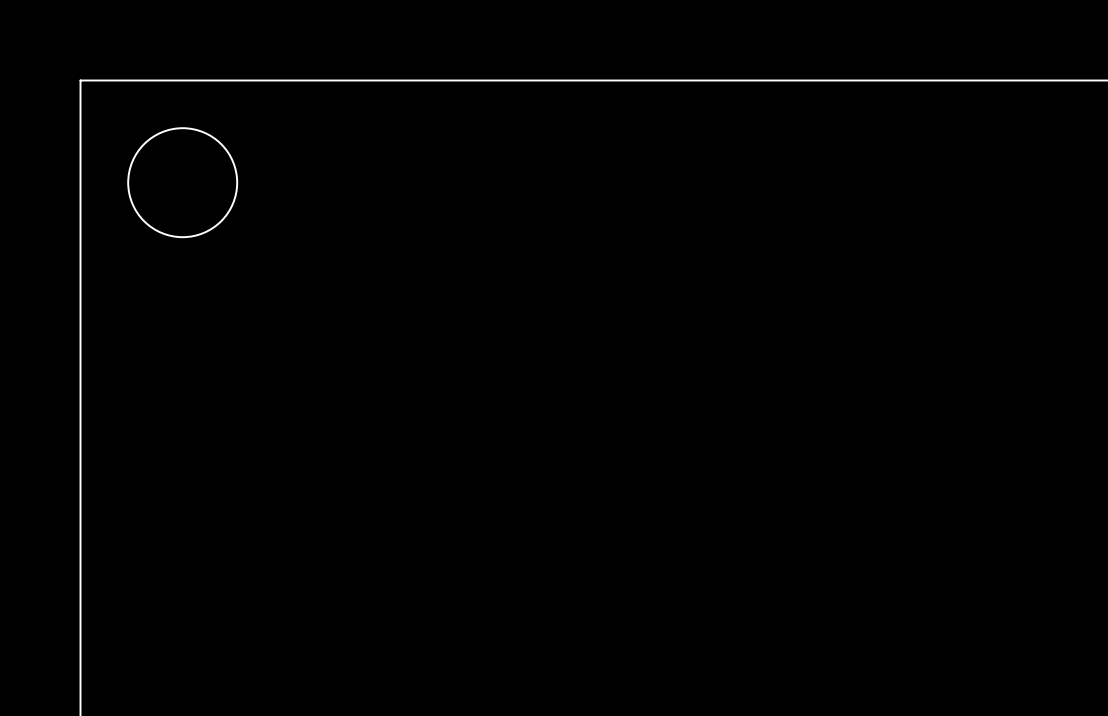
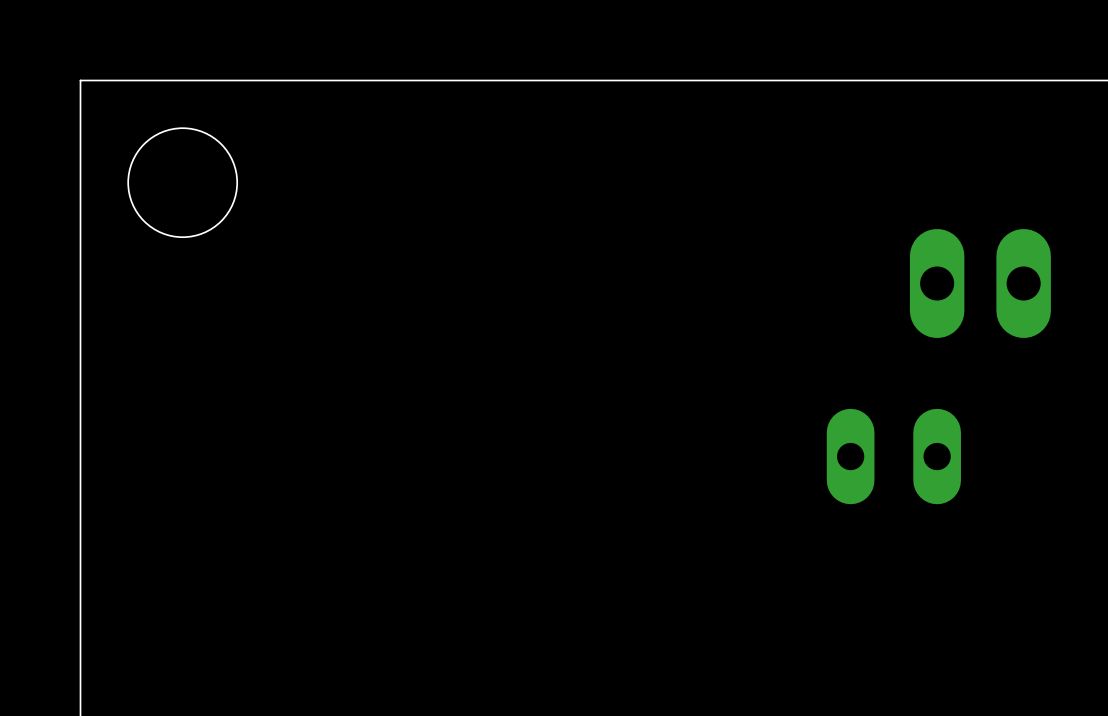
part: none -> (980, 283)
part: none -> (893, 456)

